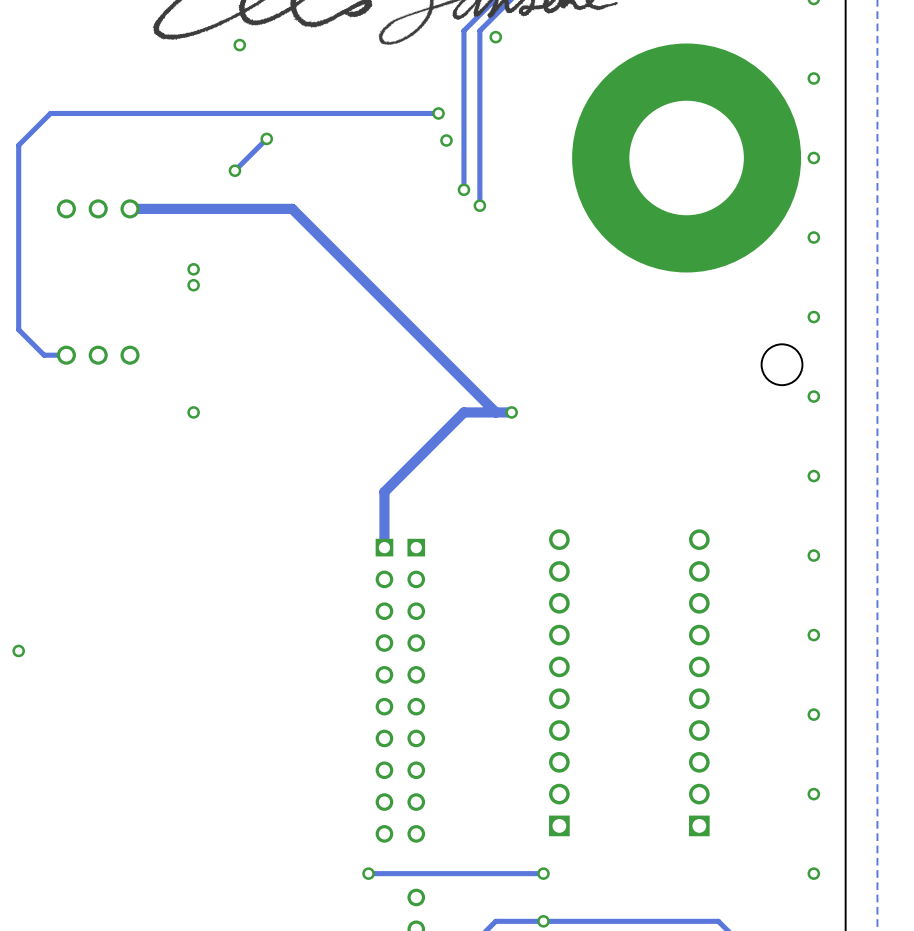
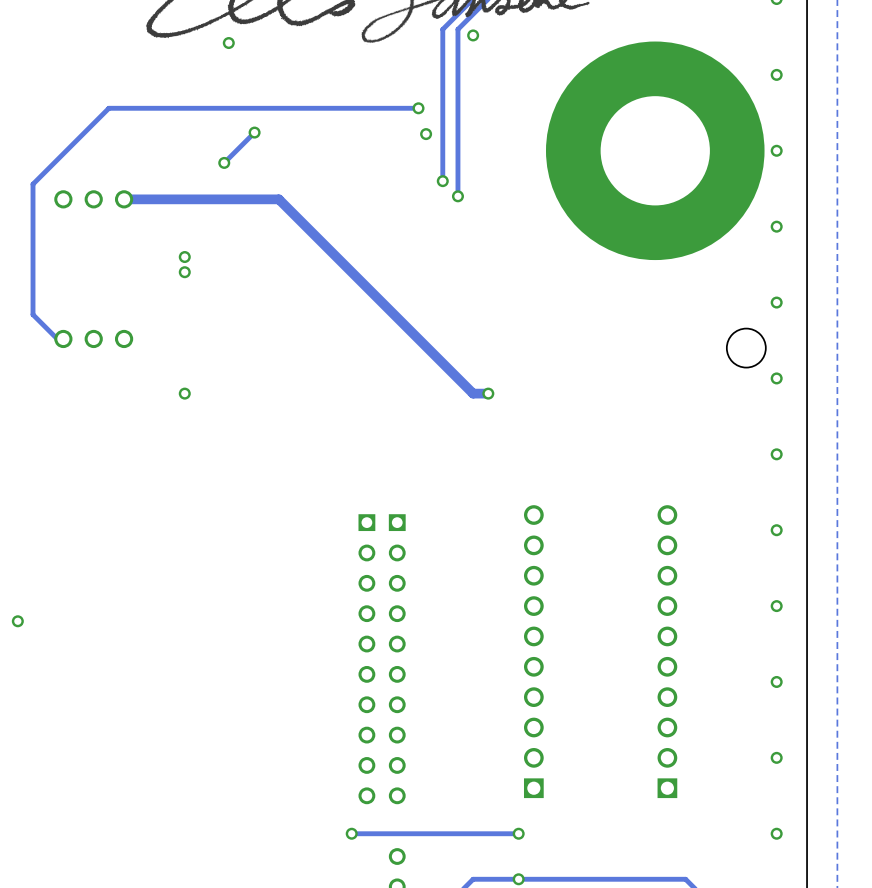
track: (114, 113) (50, 113) (18, 145) (18, 329) (44, 355) (60, 355) -> (108, 108) (33, 184) (33, 314) (57, 338)
track: (495, 412) (463, 412) (384, 491) (384, 547) -> none

